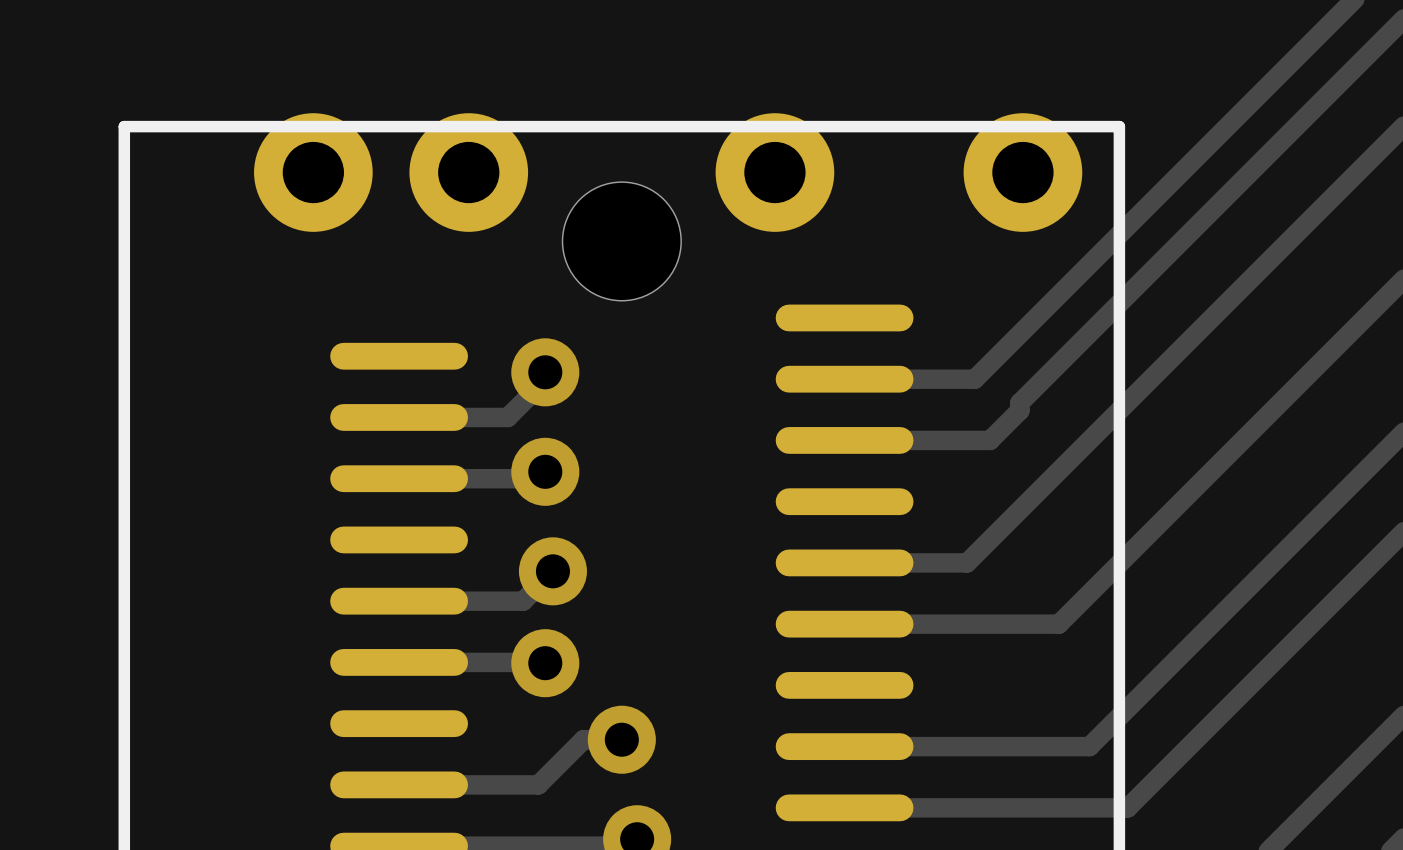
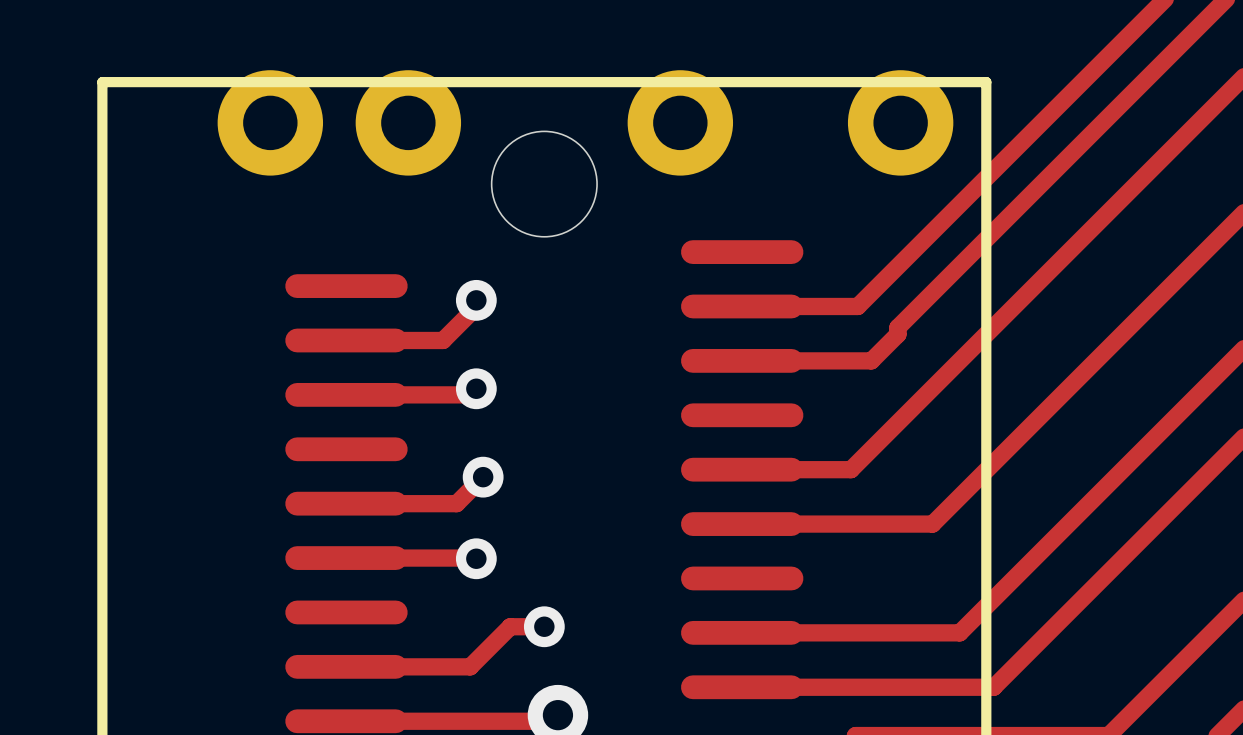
via size: [511, 338, 580, 407] -> [455, 279, 497, 321]
via size: [511, 437, 580, 506] -> [455, 368, 497, 410]
via size: [518, 537, 587, 606] -> [462, 456, 504, 498]
via size: [511, 629, 580, 698] -> [455, 538, 497, 580]
via size: [587, 705, 656, 774] -> [523, 606, 565, 648]

